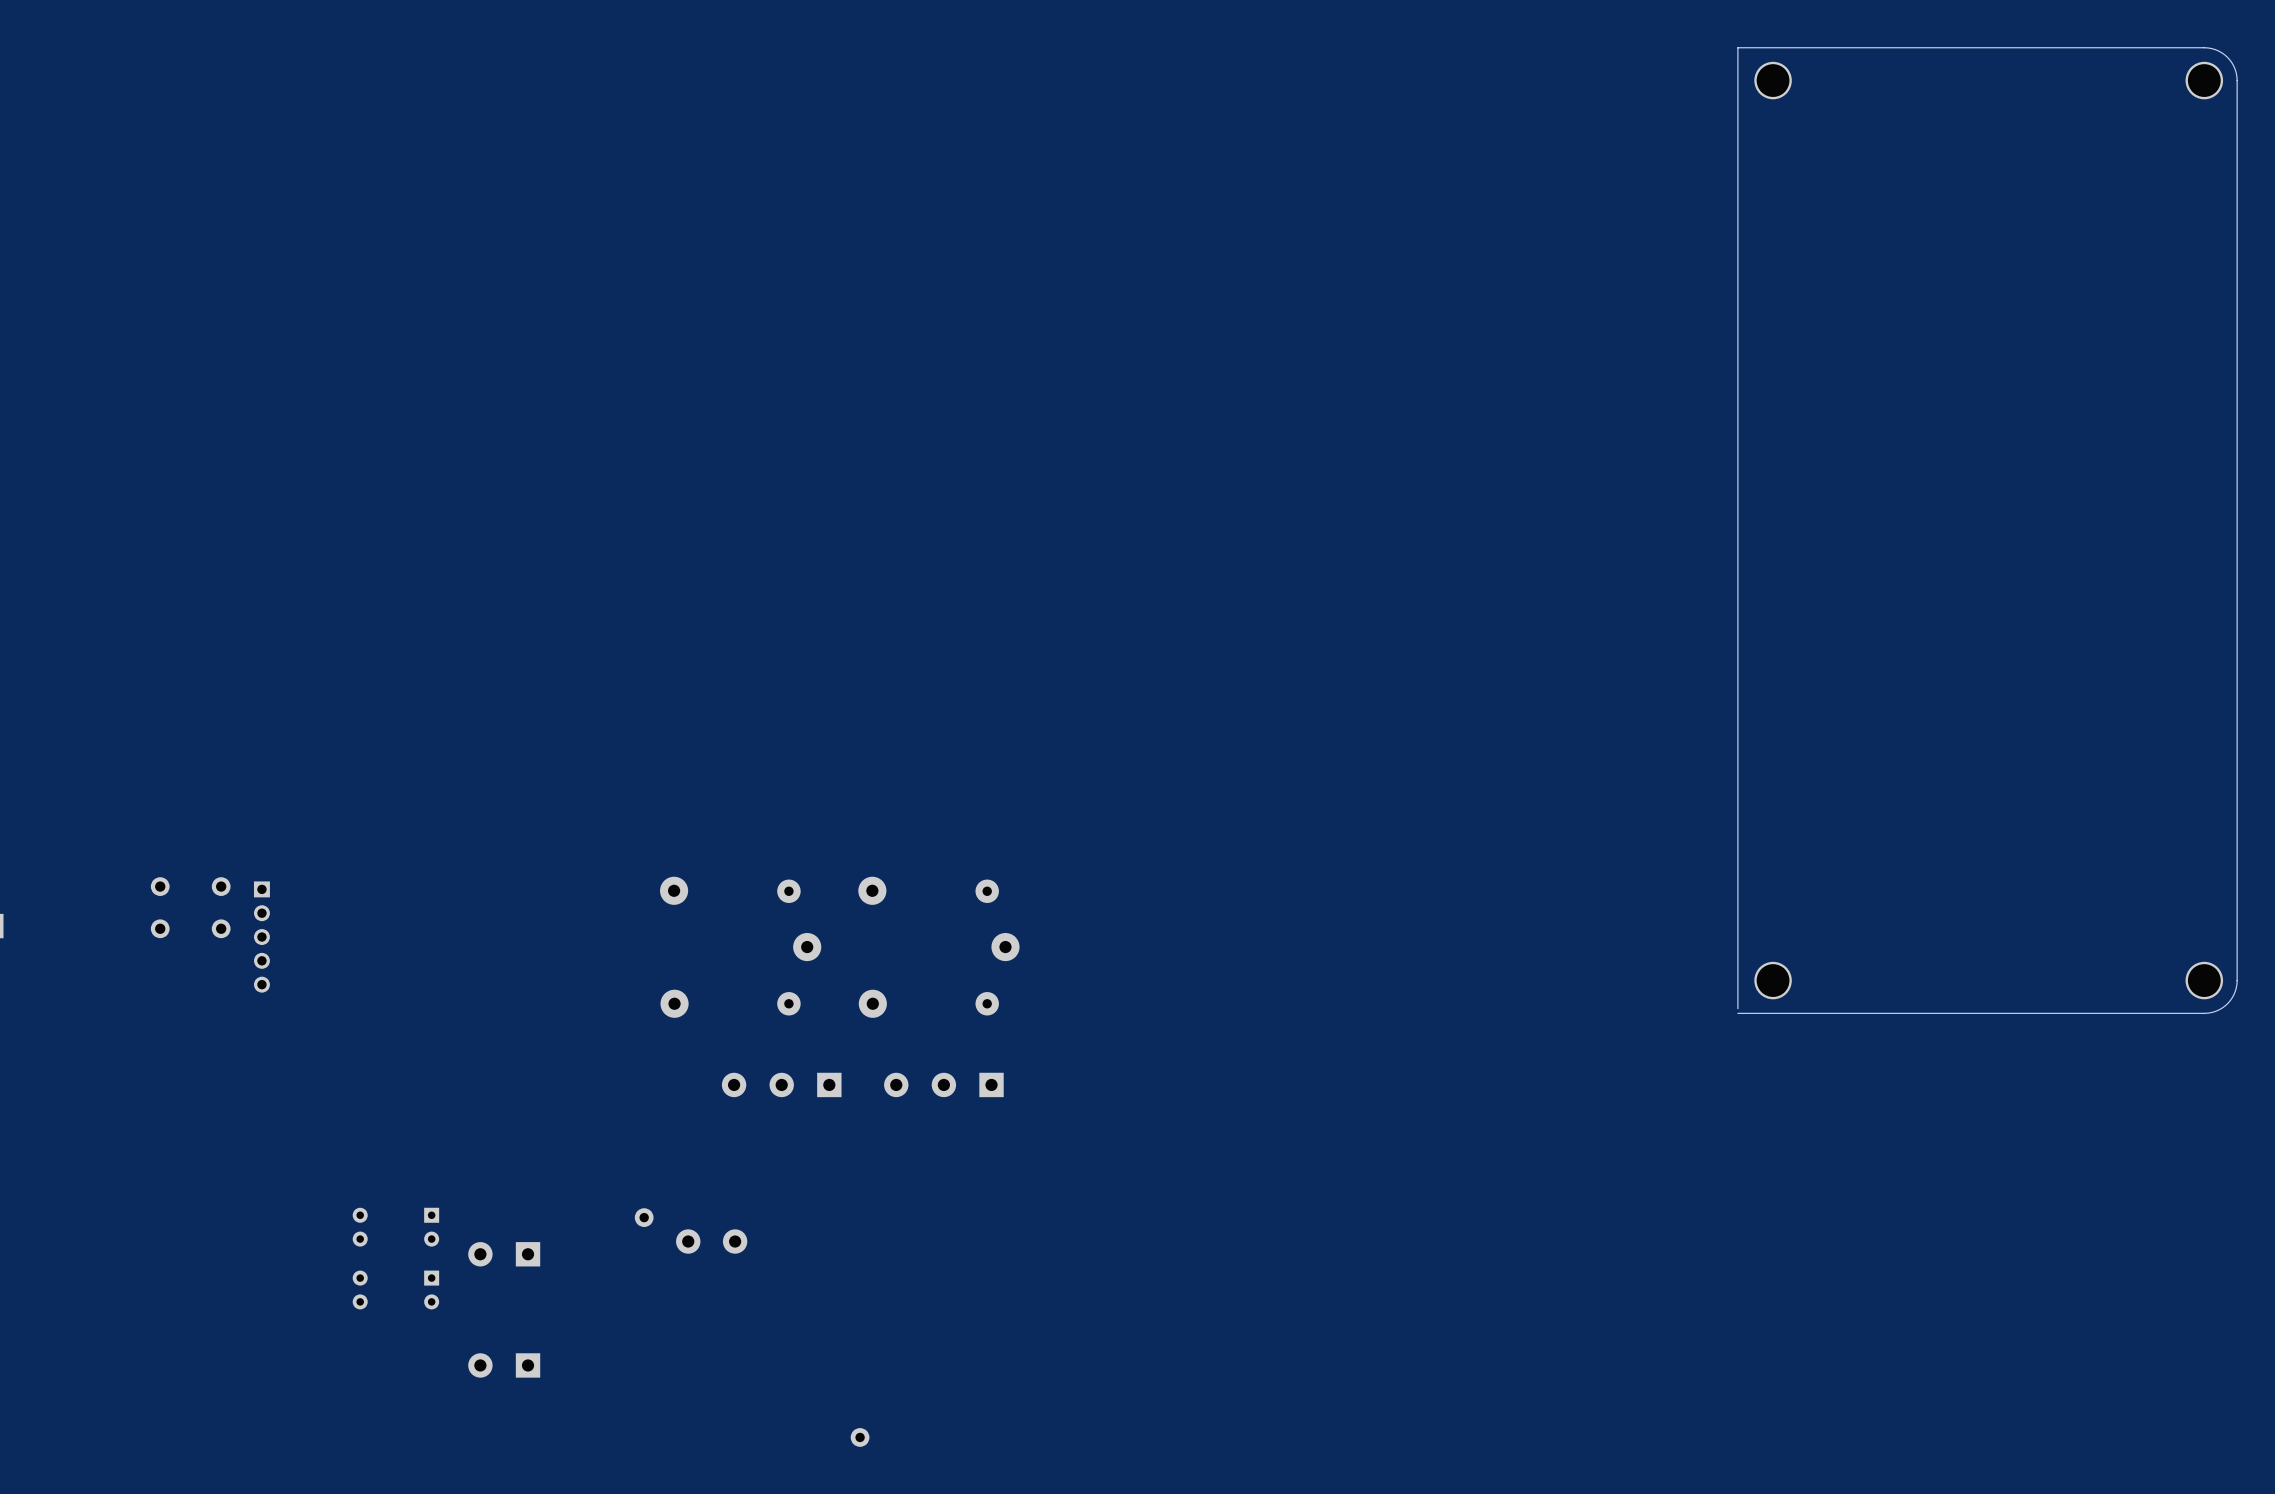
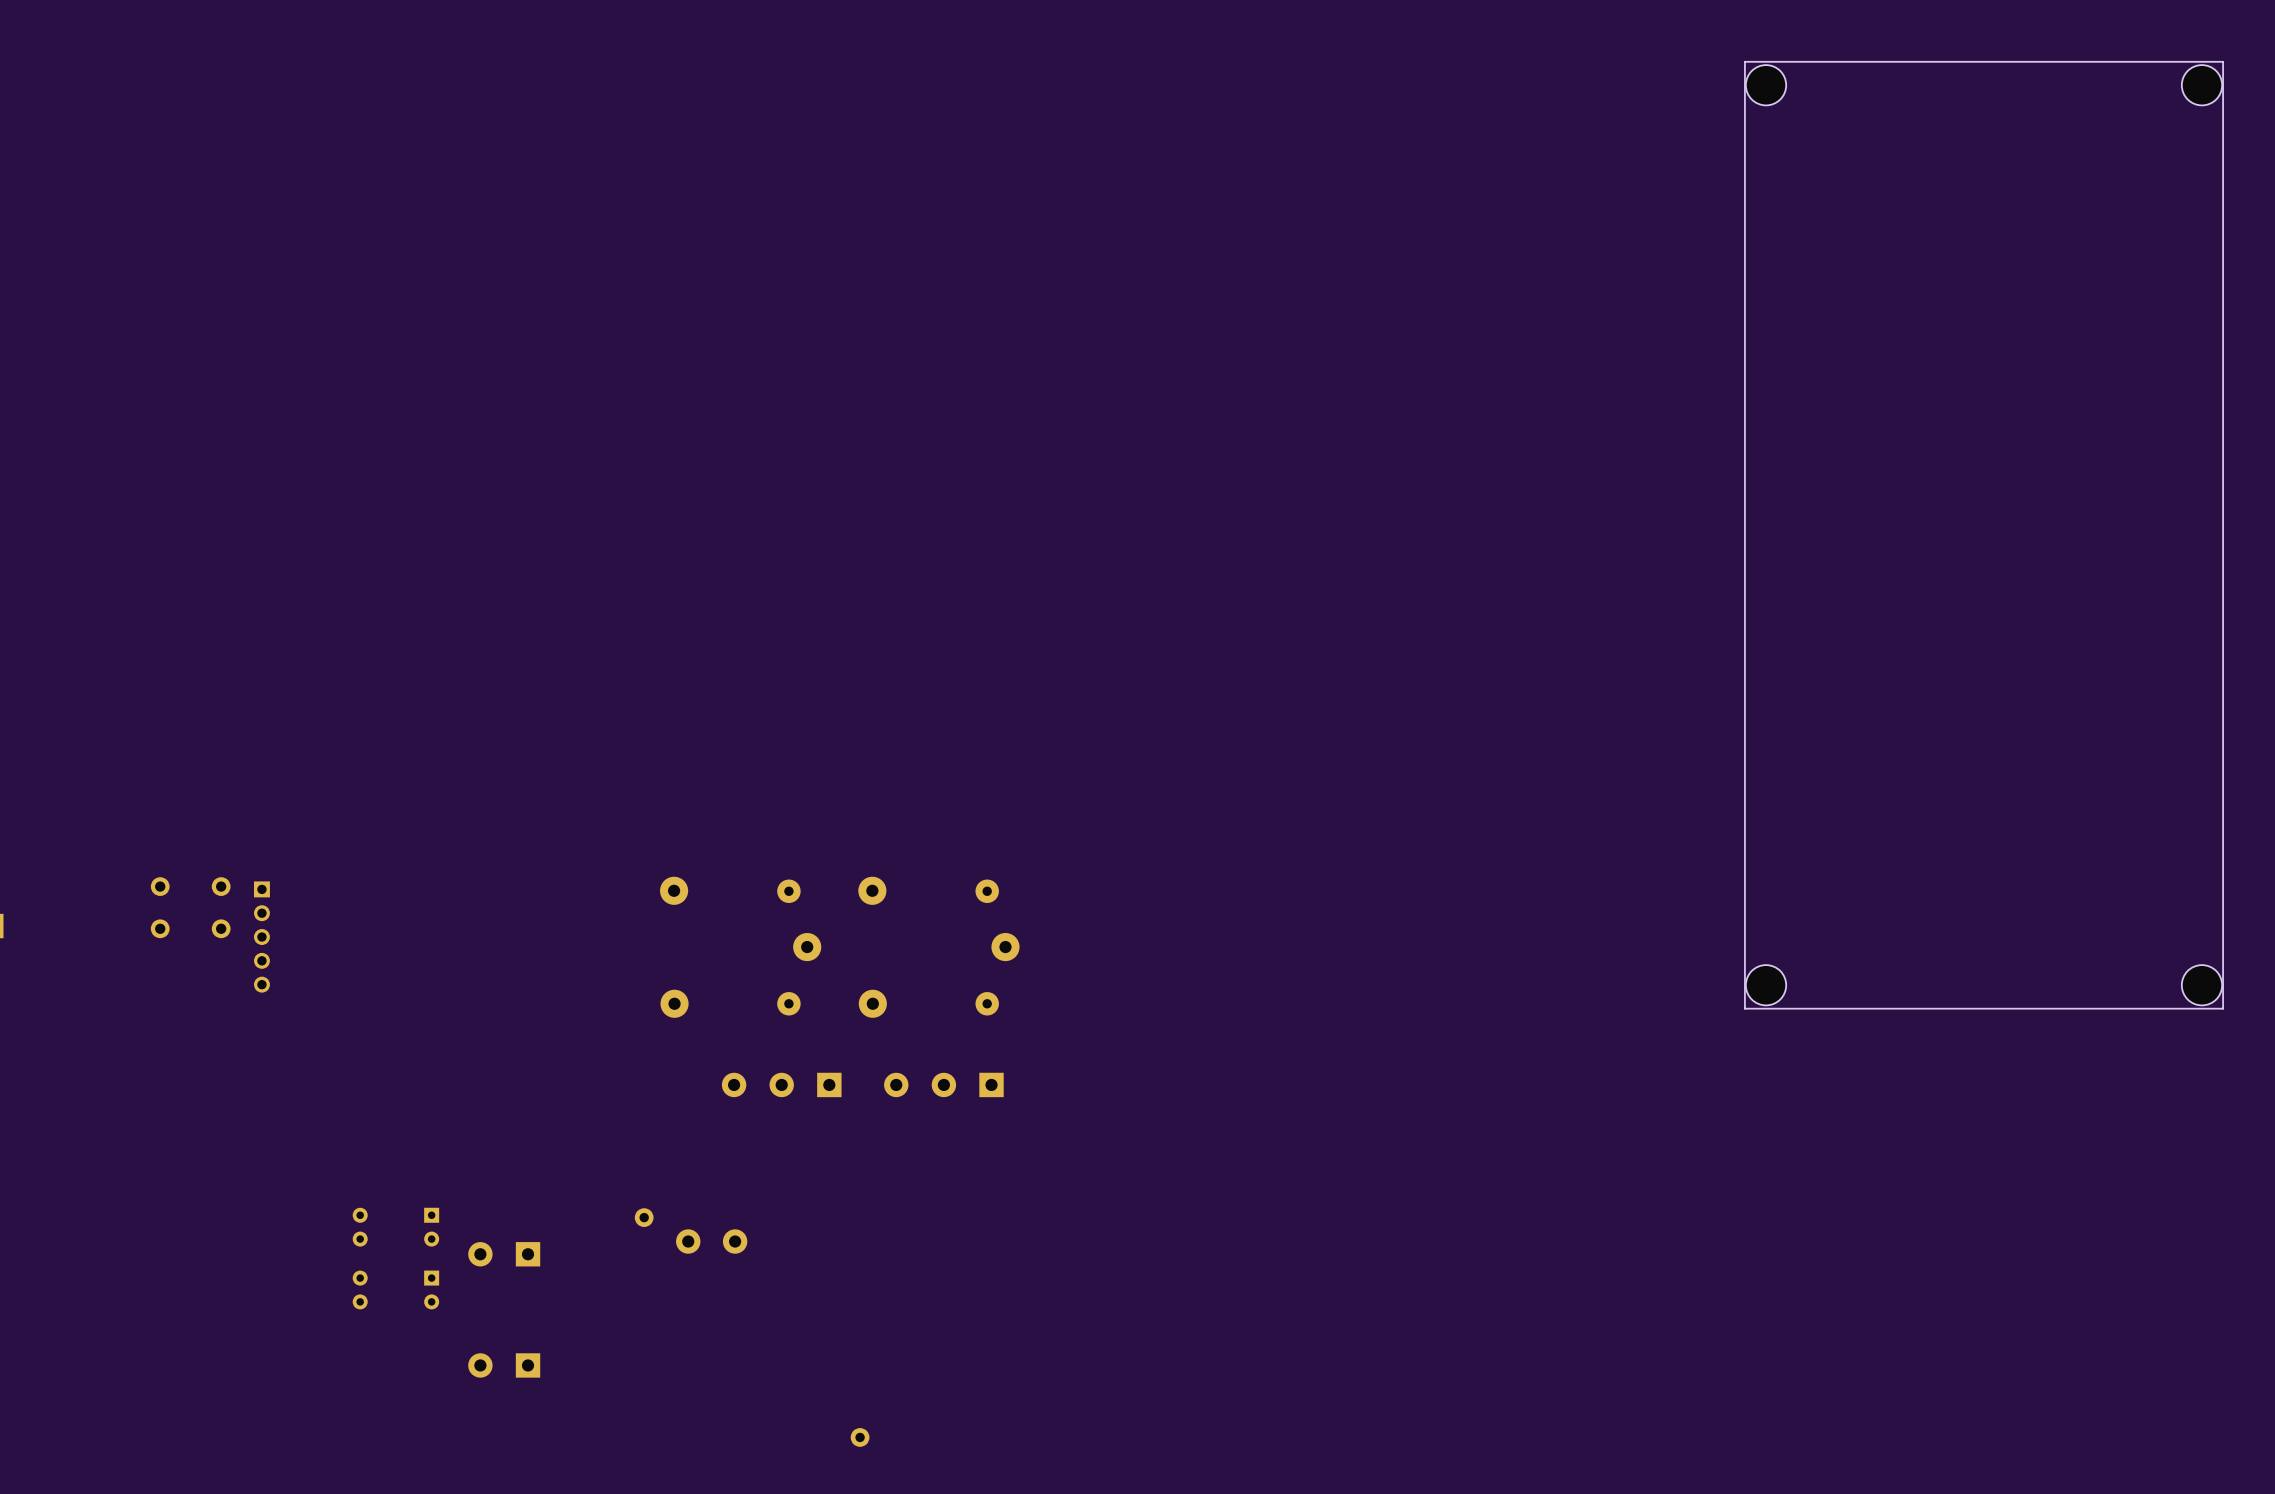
part footprint: [1754, 61, 1792, 100] -> [1745, 65, 1787, 106]
part footprint: [2185, 61, 2224, 100] -> [2181, 65, 2223, 106]
board edge: none -> (2223, 61) (1744, 61) (1744, 1008) (2223, 1008) (2223, 61)
part footprint: [1754, 961, 1792, 1000] -> [1745, 965, 1787, 1006]
part footprint: [2185, 961, 2224, 1000] -> [2181, 965, 2223, 1006]
board edge: (1737, 1008) (1737, 47) (2204, 47) (2218, 50) (2232, 63) (2237, 80) (2237, 980) (2233, 994) (2221, 1008) (2204, 1013) (1737, 1013) -> none

